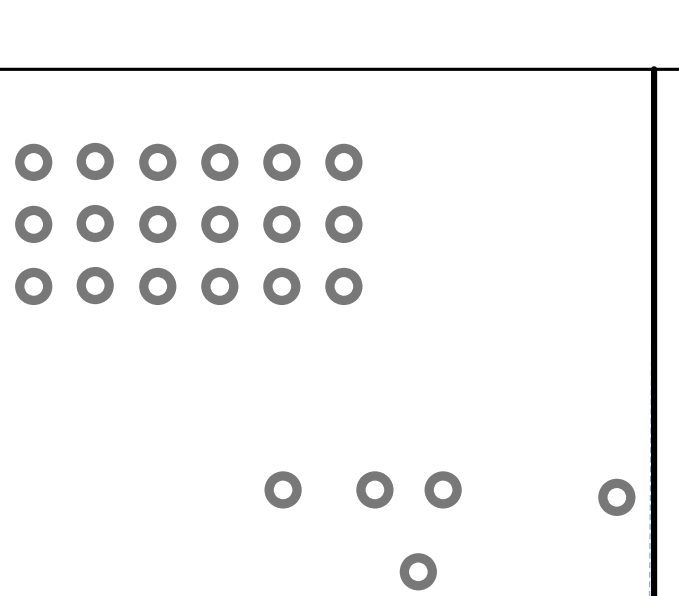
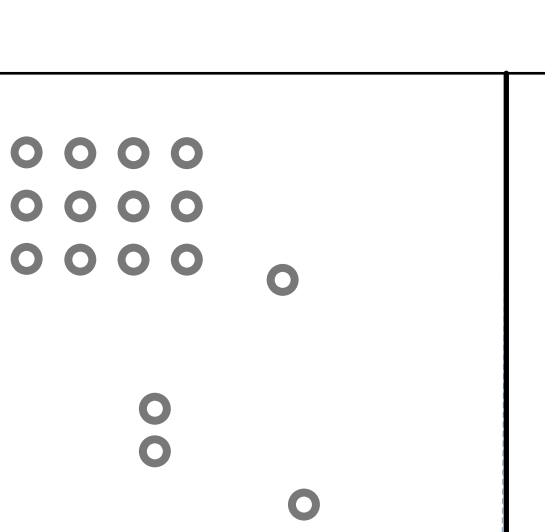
via: (343, 162) -> none
via: (343, 224) -> none
via: (343, 286) -> none
via: none -> (282, 279)
via: none -> (154, 408)
via: (283, 489) -> none
via: (374, 489) -> none
via: (443, 489) -> none
via: (616, 497) -> none
via: none -> (154, 451)

